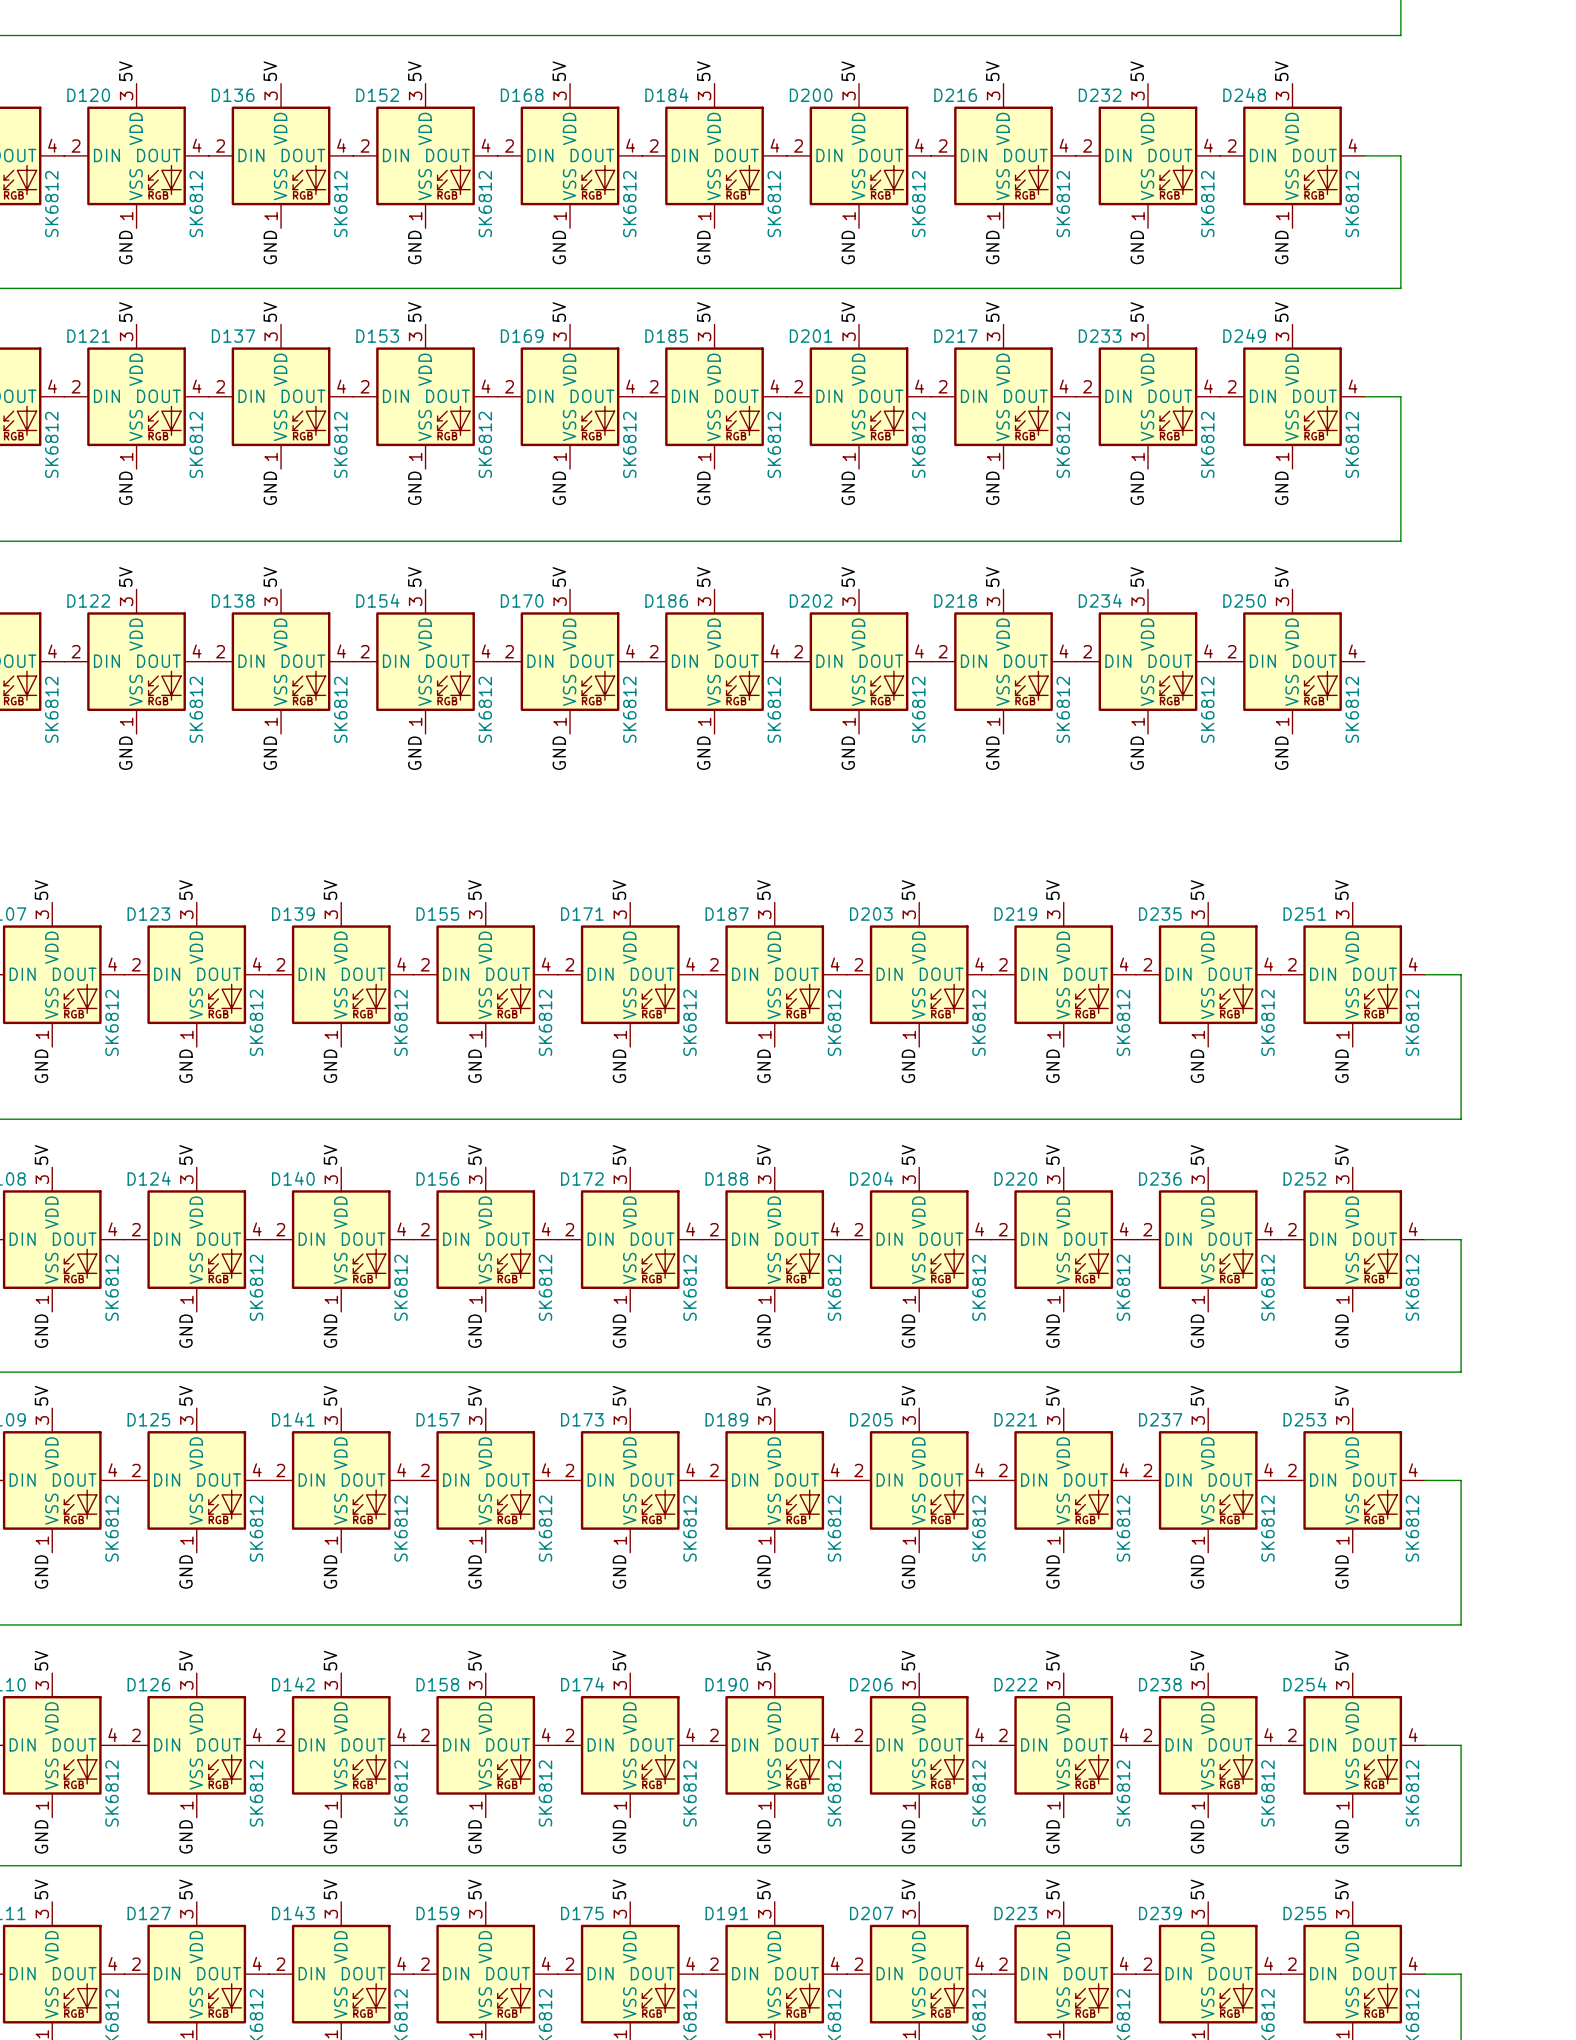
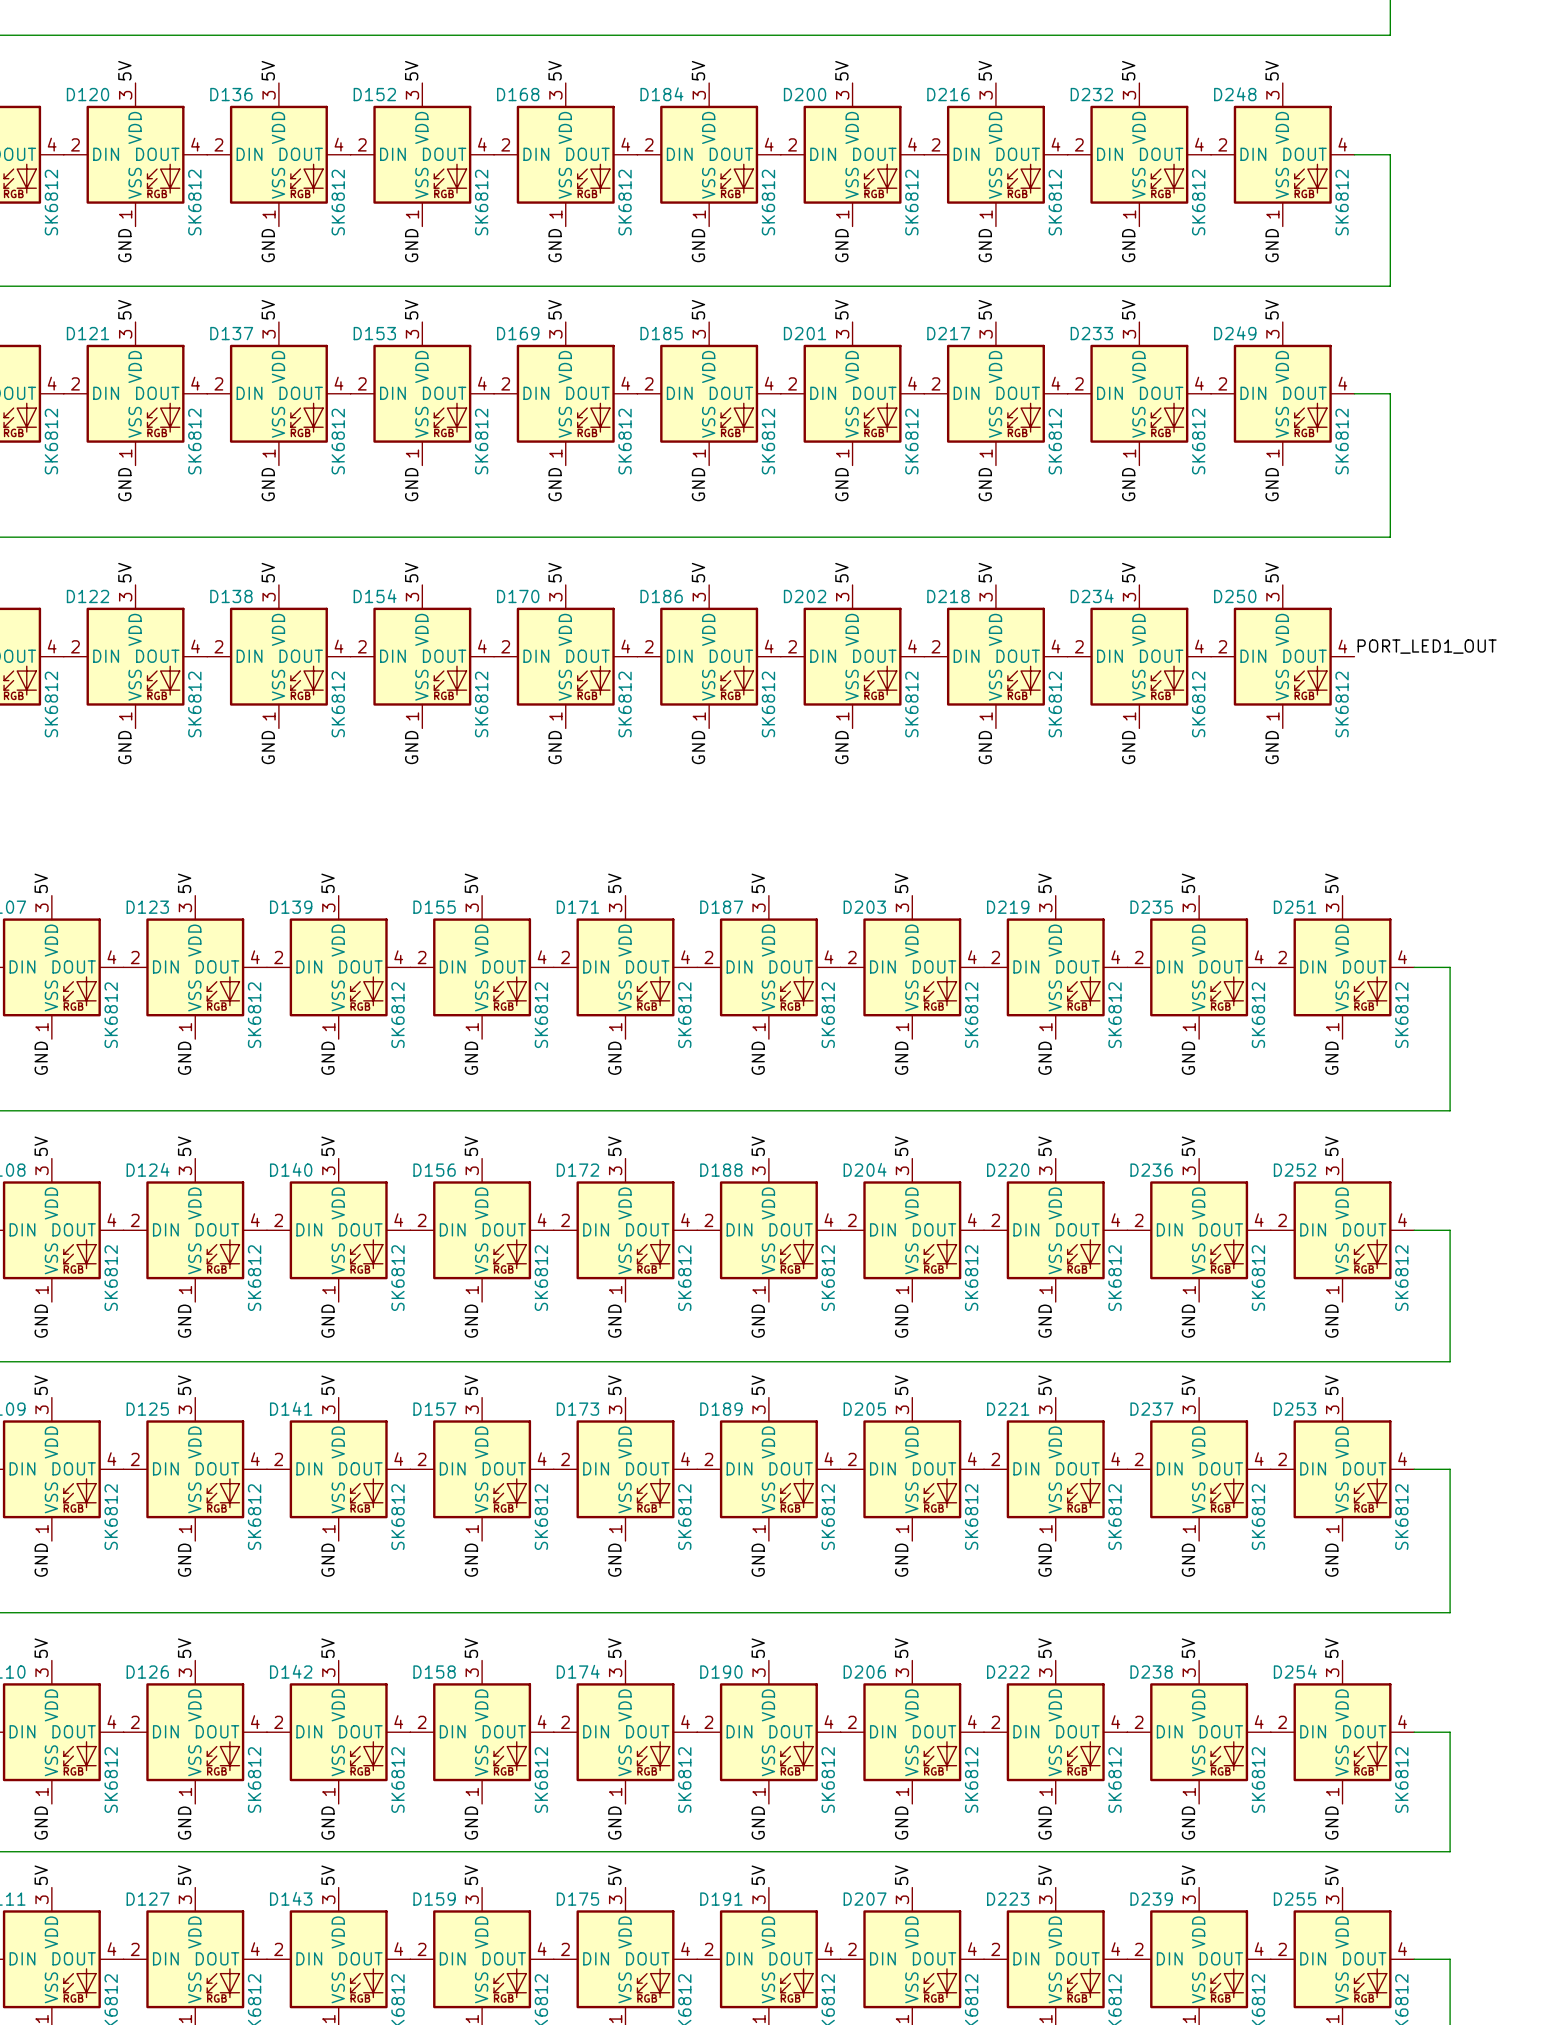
label: none -> PORT_LED1_OUT (1427, 646)

